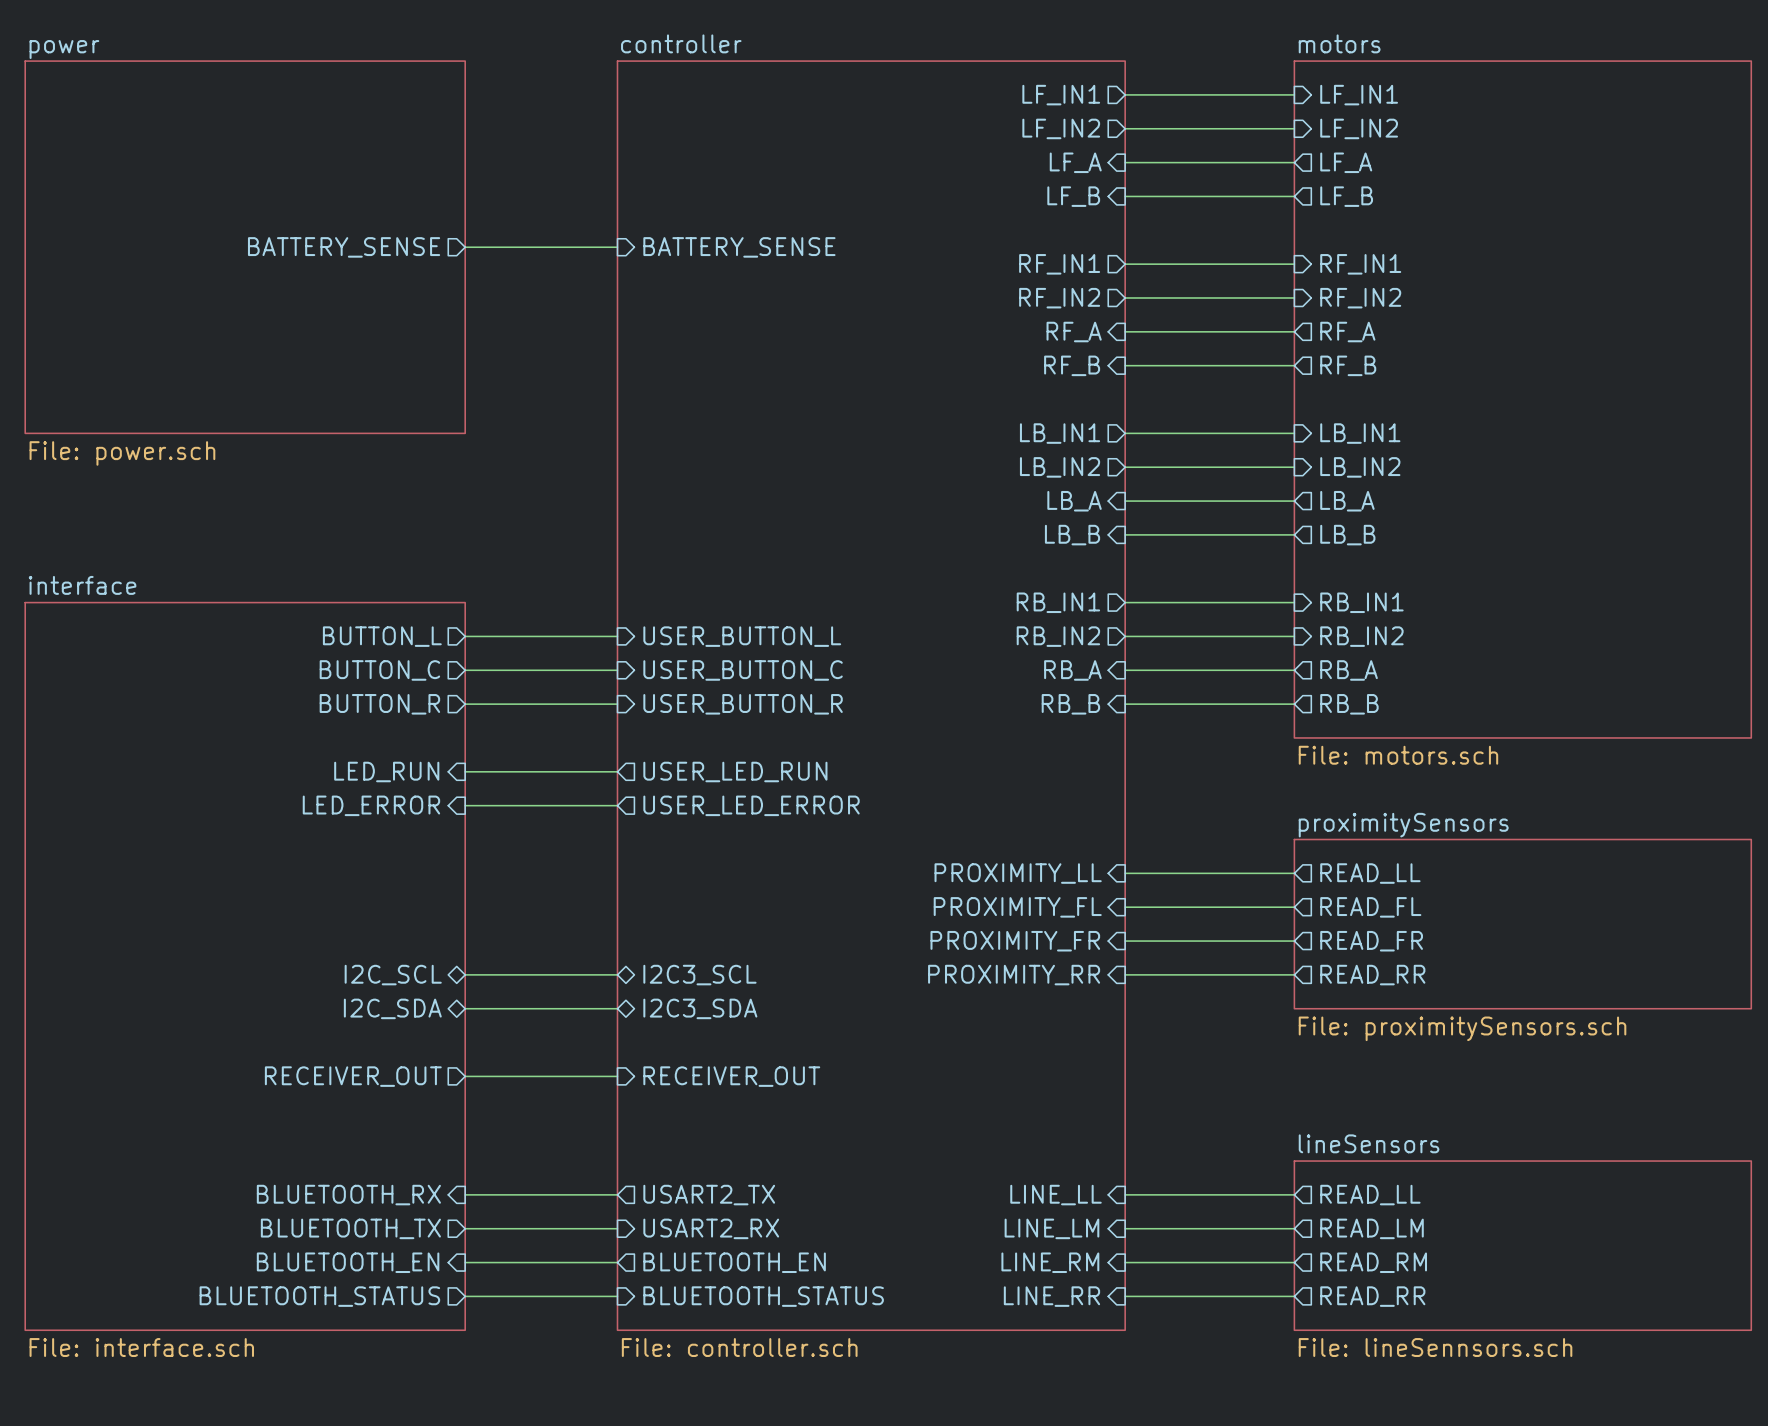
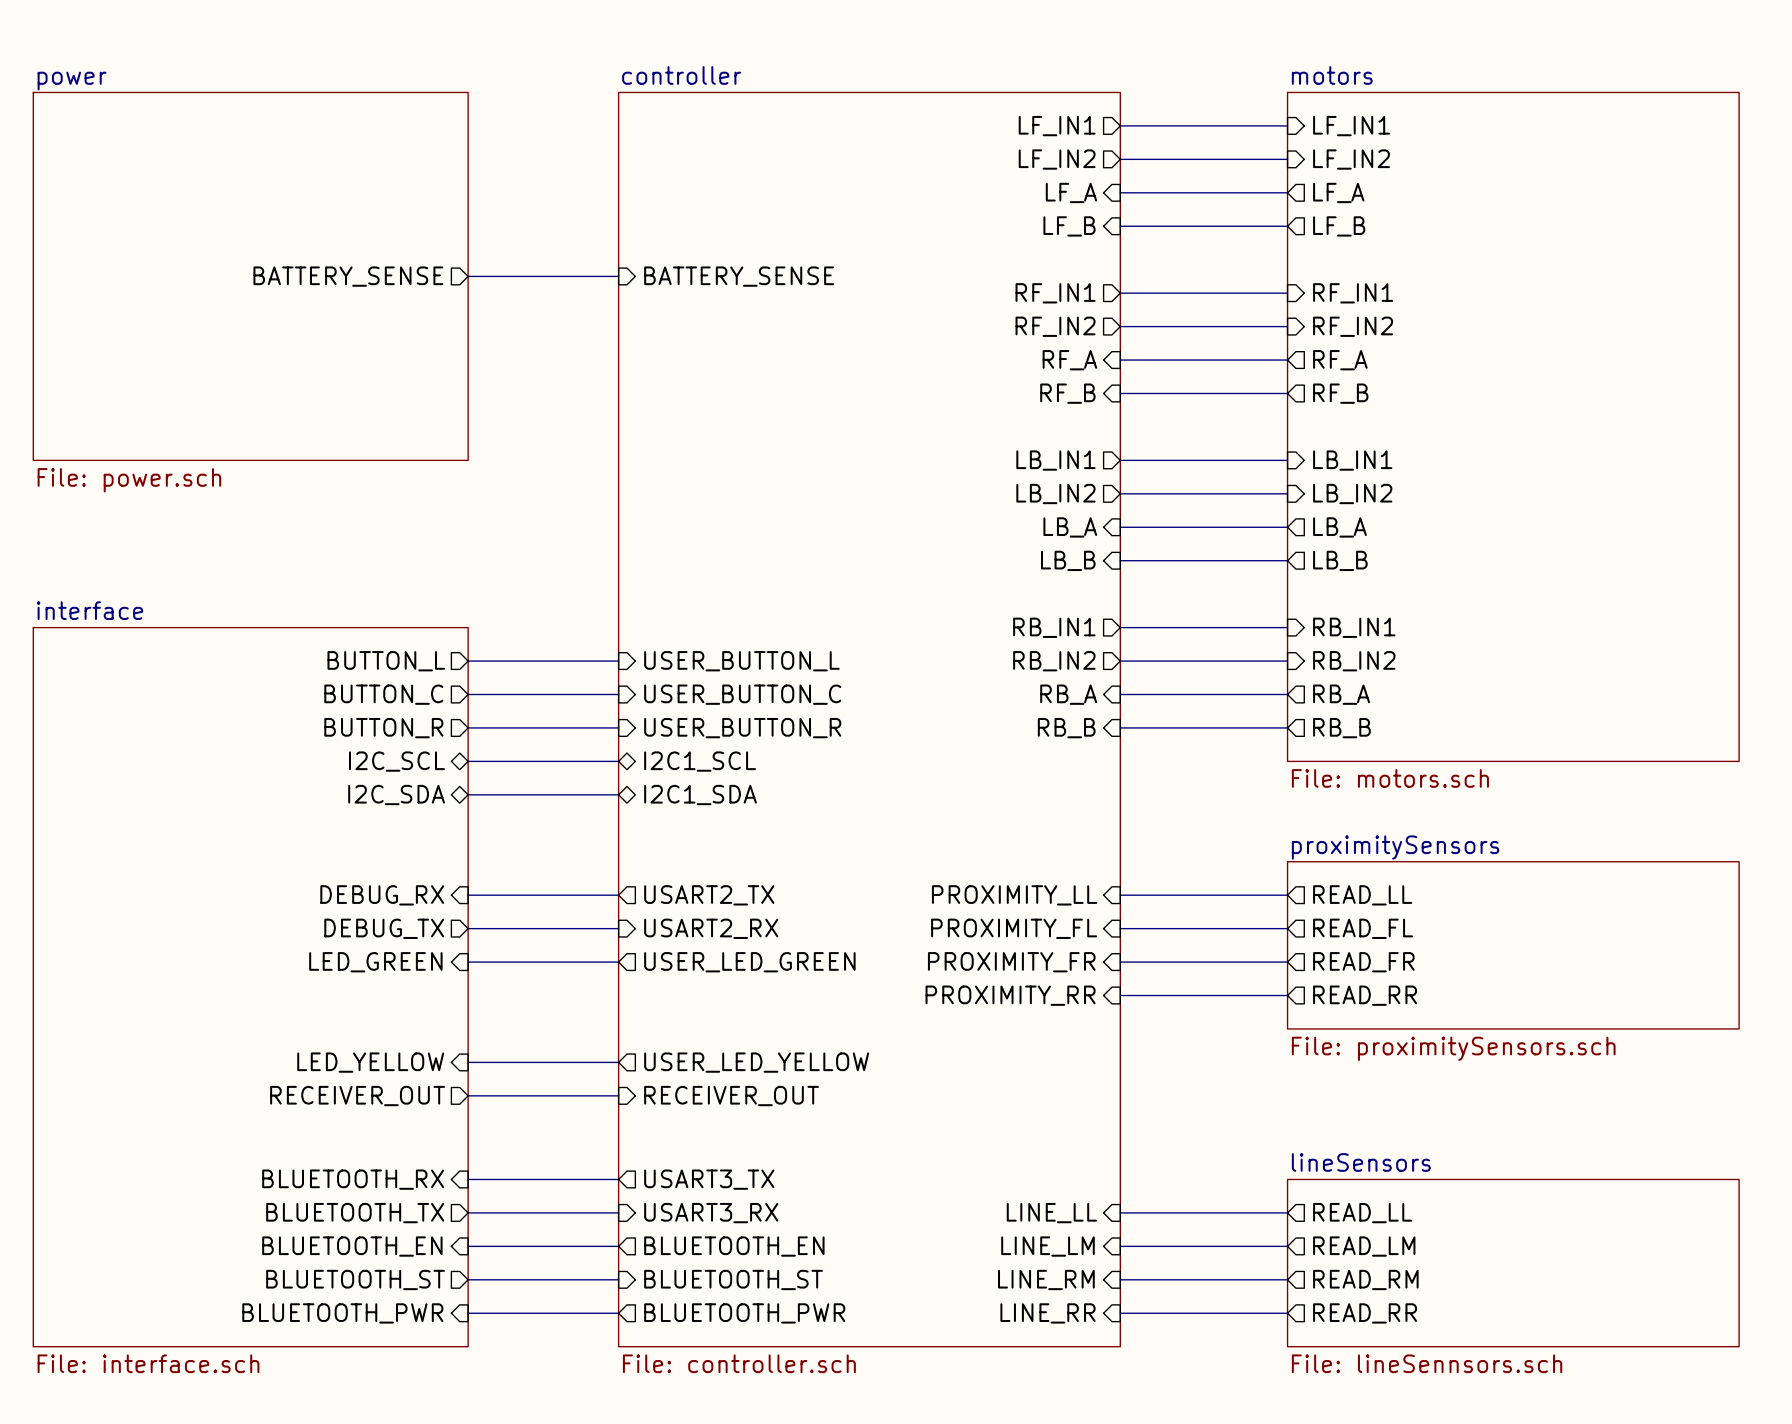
sheet pin: none -> I2C1_SCL (700, 761)
sheet pin shape: input (386, 771) -> bidirectional (396, 795)
sheet pin: LED_RUN (386, 771) -> I2C_SDA (396, 795)
sheet pin shape: output (735, 771) -> bidirectional (700, 795)
sheet pin: USER_LED_RUN (735, 771) -> I2C1_SDA (700, 795)
sheet pin: LED_ERROR (371, 805) -> none
wire: (465, 805) (617, 805) -> (468, 761) (618, 761)
sheet pin: USER_LED_ERROR (751, 805) -> none
sheet pin: none -> DEBUG_RX (382, 895)
wire: none -> (468, 895) (618, 895)
sheet pin: none -> USART2_TX (709, 895)
sheet pin: none -> DEBUG_TX (384, 928)
sheet pin: none -> USART2_RX (711, 928)
sheet pin: none -> LED_GREEN (375, 962)
sheet pin: none -> USER_LED_GREEN (749, 962)
wire: (465, 974) (617, 974) -> (468, 928) (618, 928)
sheet pin position: I2C_SCL (393, 975) -> I2C_SCL (396, 761)
sheet pin: I2C3_SCL (699, 975) -> none
sheet pin: I2C_SDA (392, 1008) -> none
wire: (465, 1008) (617, 1008) -> (468, 962) (618, 962)
sheet pin: I2C3_SDA (700, 1008) -> none
sheet pin: none -> LED_YELLOW (370, 1062)
wire: none -> (468, 1062) (618, 1062)
sheet pin: none -> USER_LED_YELLOW (756, 1062)
sheet pin: none -> BLUETOOTH_RX (353, 1179)
wire: none -> (468, 1179) (618, 1179)
sheet pin: none -> USART3_TX (709, 1179)
sheet pin shape: input (348, 1195) -> output (355, 1213)
sheet pin: BLUETOOTH_RX (348, 1195) -> BLUETOOTH_TX (355, 1213)
sheet pin shape: output (709, 1195) -> input (711, 1213)
sheet pin: USART2_TX (709, 1195) -> USART3_RX (711, 1213)
sheet pin shape: output (350, 1228) -> input (352, 1246)
sheet pin: BLUETOOTH_TX (350, 1228) -> BLUETOOTH_EN (352, 1246)
sheet pin shape: input (711, 1228) -> output (734, 1246)
sheet pin: USART2_RX (711, 1228) -> BLUETOOTH_EN (734, 1246)
sheet pin shape: input (348, 1262) -> output (355, 1279)
sheet pin: BLUETOOTH_EN (348, 1262) -> BLUETOOTH_ST (355, 1279)
sheet pin shape: output (734, 1262) -> input (733, 1279)
sheet pin: BLUETOOTH_EN (734, 1262) -> BLUETOOTH_ST (733, 1279)
sheet pin shape: output (319, 1296) -> input (342, 1313)
sheet pin: BLUETOOTH_STATUS (319, 1296) -> BLUETOOTH_PWR (342, 1313)
sheet pin shape: input (763, 1296) -> output (744, 1313)
sheet pin: BLUETOOTH_STATUS (763, 1296) -> BLUETOOTH_PWR (744, 1313)

